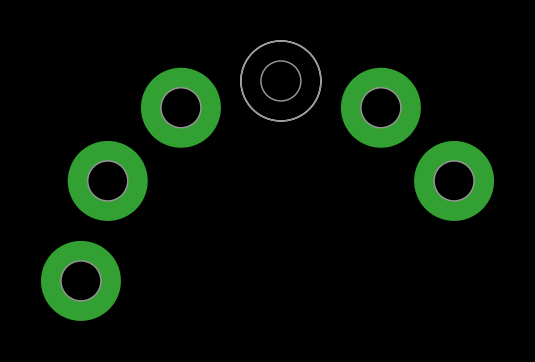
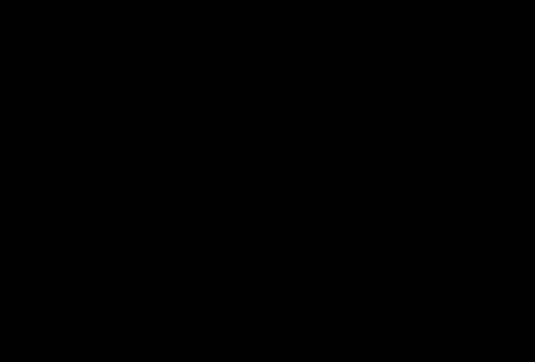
part: (267, 180) -> none

